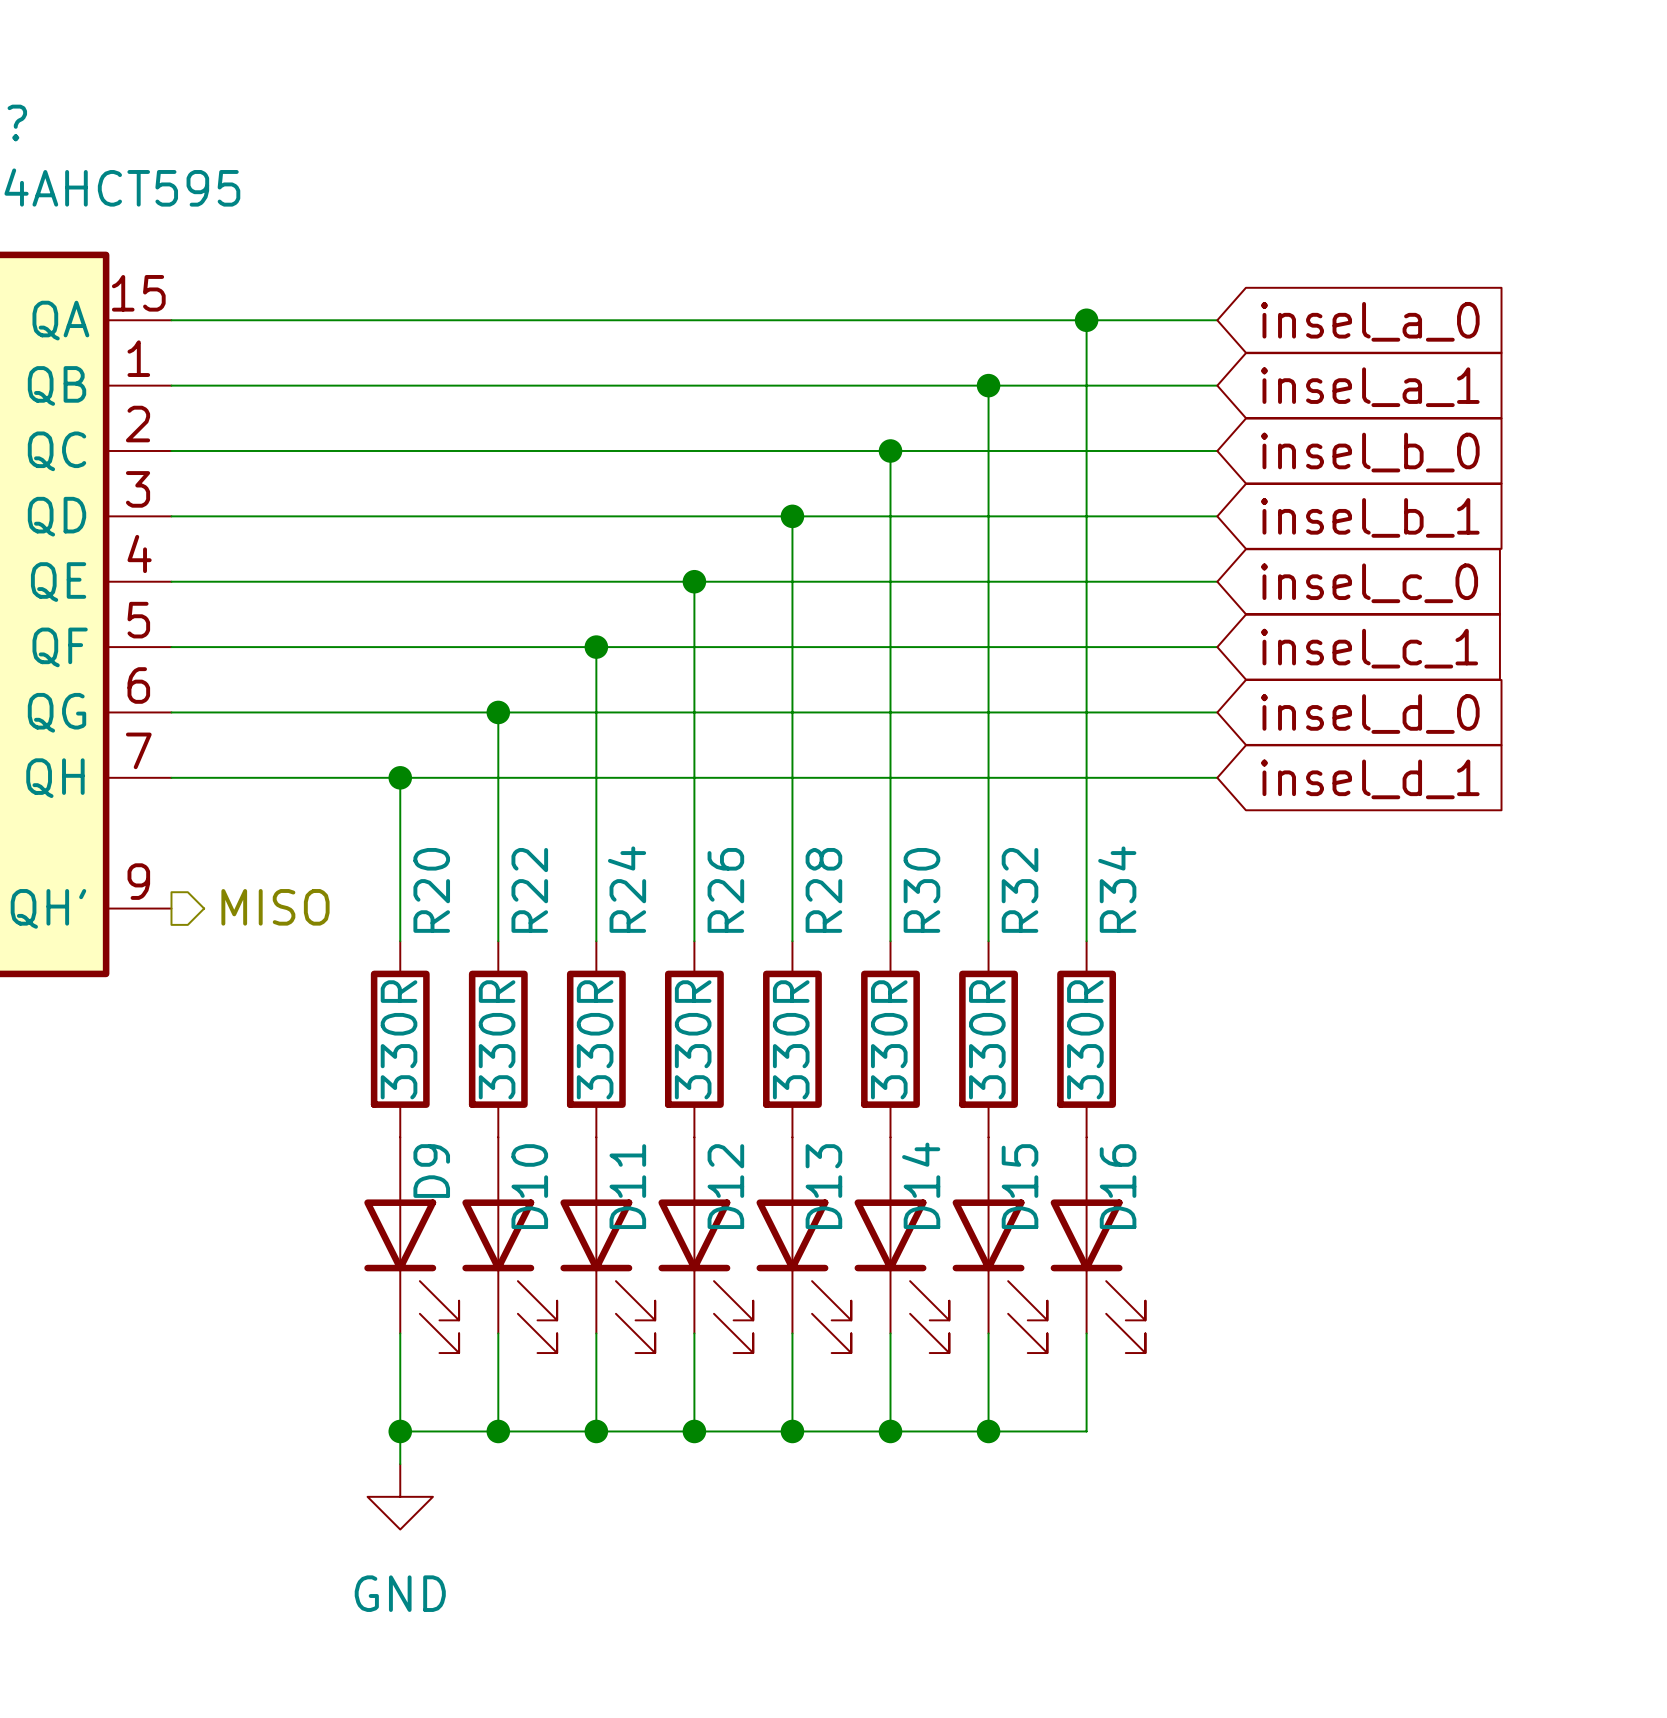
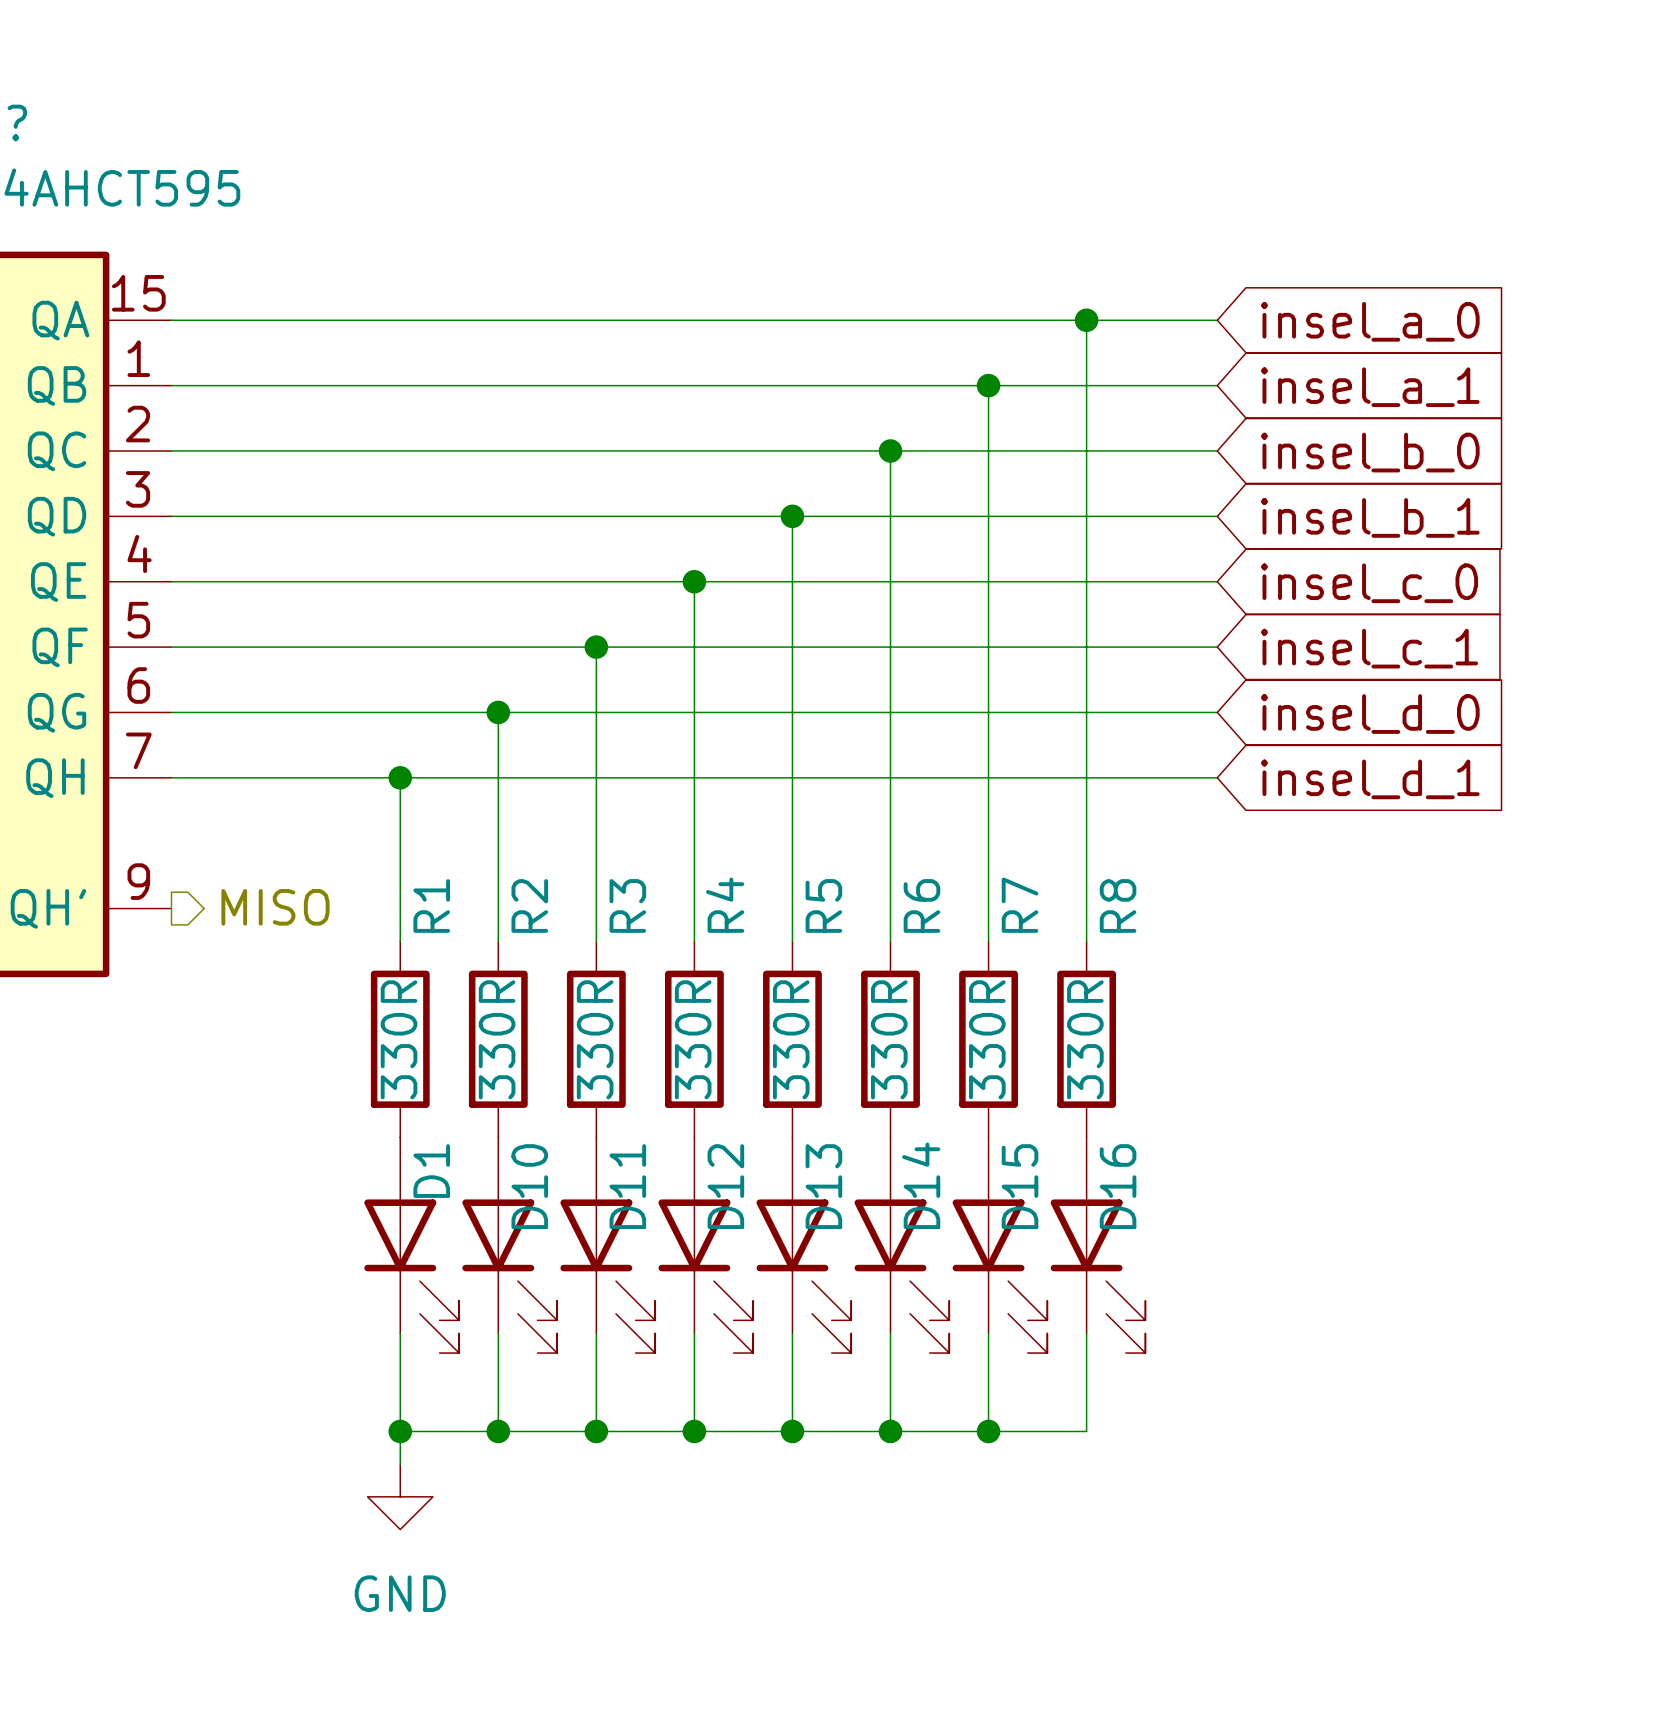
R24 name: R24 (627, 889) -> R3 (627, 905)
R34 name: R34 (1117, 889) -> R8 (1118, 905)
R20 name: R20 (431, 890) -> R1 (431, 905)
R22 name: R22 (529, 890) -> R2 (529, 905)
R26 name: R26 (725, 890) -> R4 (725, 905)
R28 name: R28 (823, 890) -> R5 (823, 905)
R30 name: R30 (921, 890) -> R6 (921, 905)
R32 name: R32 (1020, 890) -> R7 (1020, 905)
D9 name: D9 (431, 1171) -> D1 (431, 1171)

